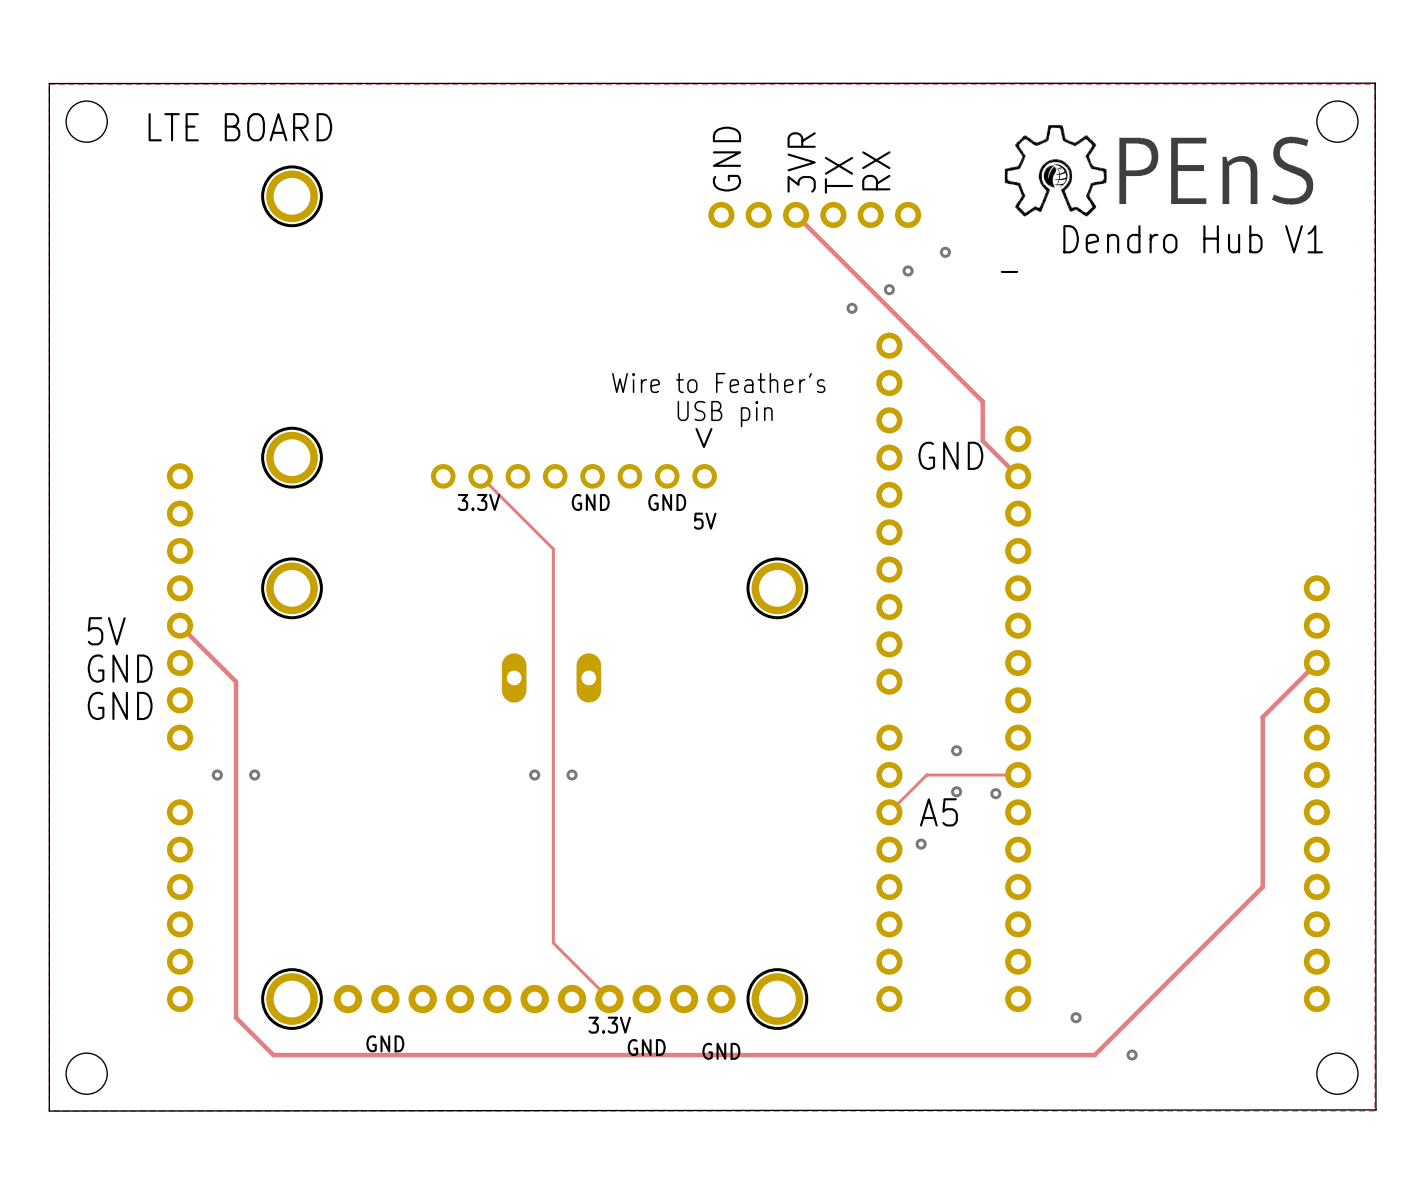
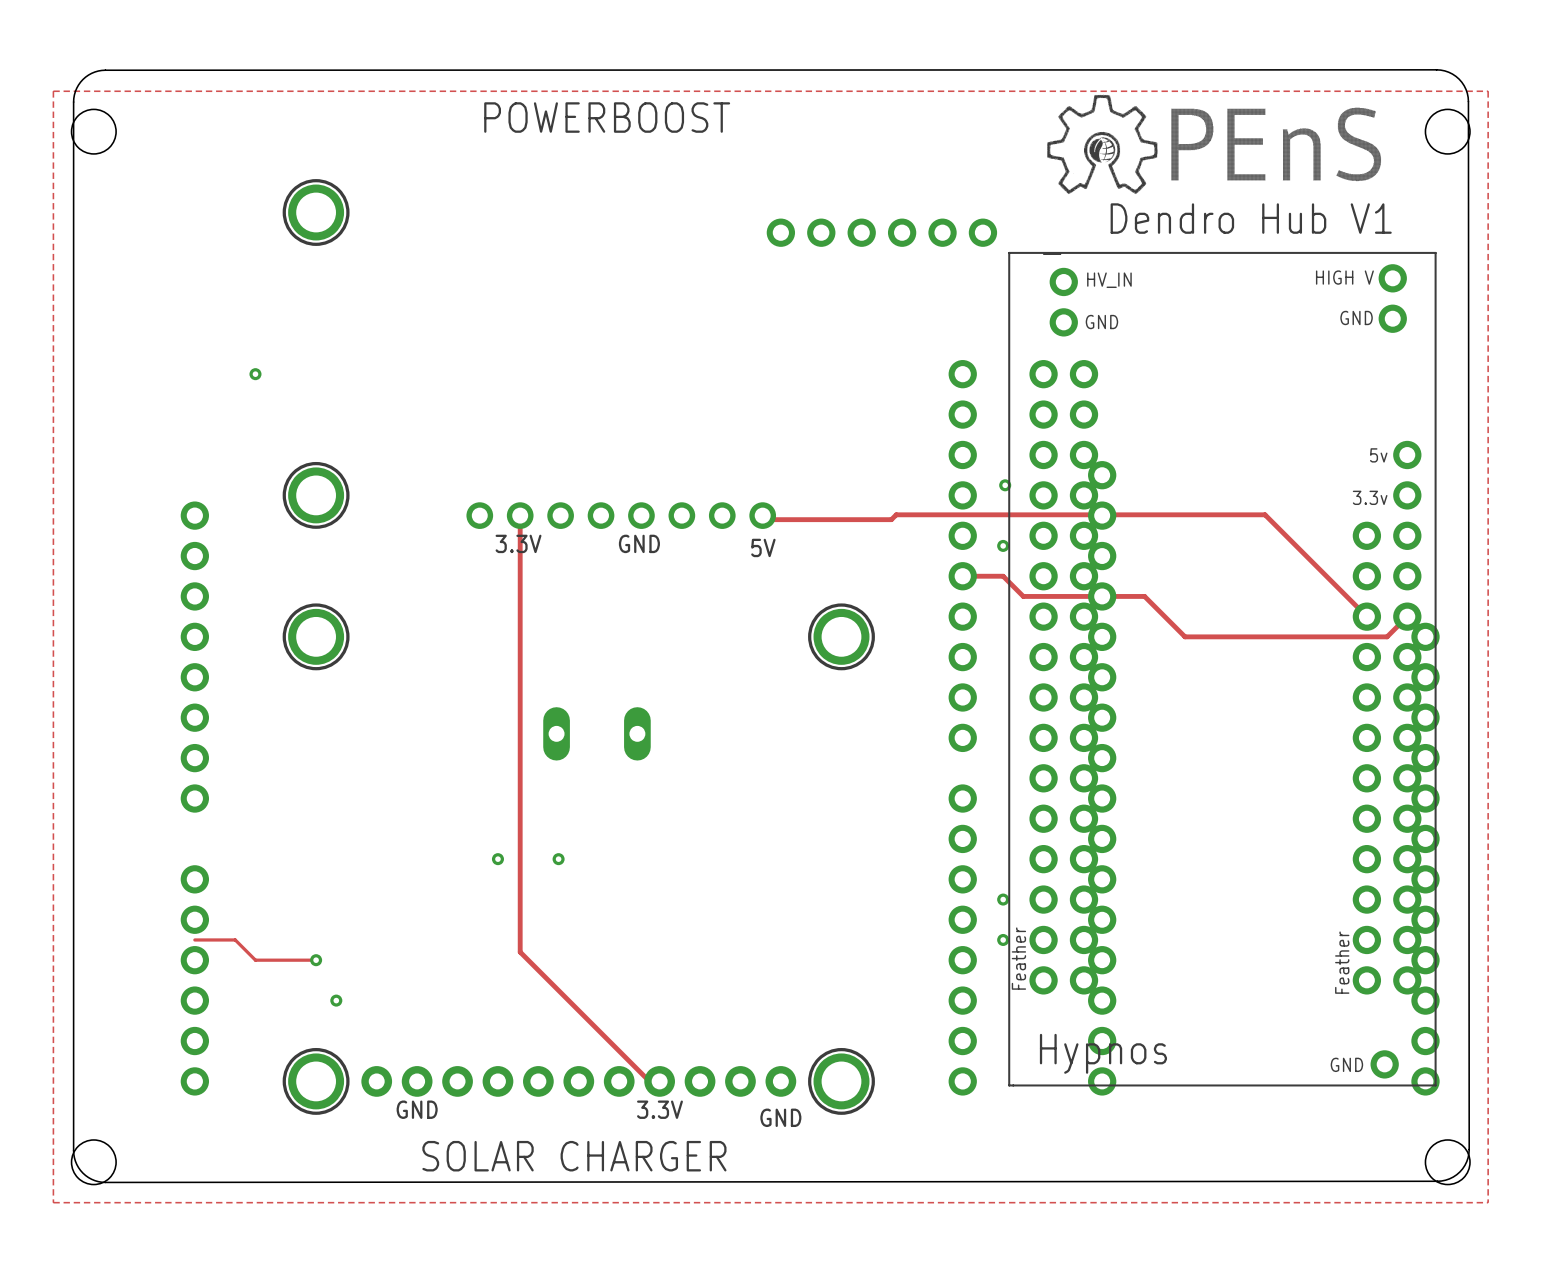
board edge: (1375, 83) (1375, 1109) (49, 1111) (49, 83) (1375, 83) -> (1436, 69) (105, 70) (94, 72) (85, 77) (76, 88) (73, 102) (73, 1150) (75, 1161) (80, 1170) (91, 1179) (105, 1182) (1437, 1181) (1445, 1180) (1456, 1174) (1466, 1161) (1469, 1149) (1468, 101) (1466, 89) (1459, 79) (1448, 72) (1436, 69)
text: none -> POWERBOOST (607, 117)
text: LTE BOARD (240, 127) -> none
text: GND (726, 159) -> none
text: 3VR (801, 162) -> none
text: RX (876, 170) -> none
drawing position: (1159, 170) -> (1214, 144)
text: TX (838, 175) -> none
track: (796, 214) (982, 401) (982, 440) (1018, 476) -> none
text position: Dendro Hub V1 (1193, 239) -> Dendro Hub V1 (1251, 218)
via: (945, 252) -> none
via: (908, 270) -> none
via: (889, 289) -> none
via: (852, 308) -> none
via: none -> (255, 374)
text: Wire to Feather's (718, 382) -> none
text: USB pin (725, 414) -> none
text: < (703, 437) -> none
via: none -> (1005, 485)
text: GND (950, 455) -> none
track: (480, 476) (553, 549) (553, 943) (609, 999) -> none
track: none -> (520, 519) (520, 952) (659, 1091)
track: none -> (762, 519) (891, 519) (896, 514) (1265, 514) (1366, 616)
text: GND (667, 502) -> none
via: none -> (1003, 545)
text position: 5V (705, 521) -> 5V (763, 547)
track: none -> (962, 576) (1003, 576) (1023, 596) (1144, 596) (1185, 636) (1387, 636) (1407, 616)
part: none -> (1222, 669)
track: (180, 625) (236, 681) (236, 1017) (273, 1055) (1094, 1055) (1262, 887) (1262, 717) (1316, 663) -> none
text: 5V (106, 631) -> none
text: GND (120, 668) -> none
text: GND (120, 705) -> none
via: (956, 750) -> none
via: (217, 775) -> none
via: (254, 775) -> none
via position: (534, 775) -> (558, 859)
via: (572, 775) -> none
track: (1018, 775) (926, 775) (889, 812) -> none
via: (956, 791) -> none
via: none -> (497, 859)
via: (995, 793) -> none
text: A5 (938, 812) -> none
via: none -> (1003, 899)
via: (921, 844) -> none
track: none -> (194, 939) (235, 939) (255, 960) (316, 960)
via: none -> (1003, 939)
via: none -> (316, 960)
via: none -> (336, 1000)
via: (1076, 1017) -> none
text position: GND (385, 1043) -> GND (417, 1109)
text: GND (646, 1047) -> none
text position: GND (721, 1051) -> GND (780, 1117)
via: (1132, 1055) -> none
text: none -> SOLAR CHARGER (574, 1156)

